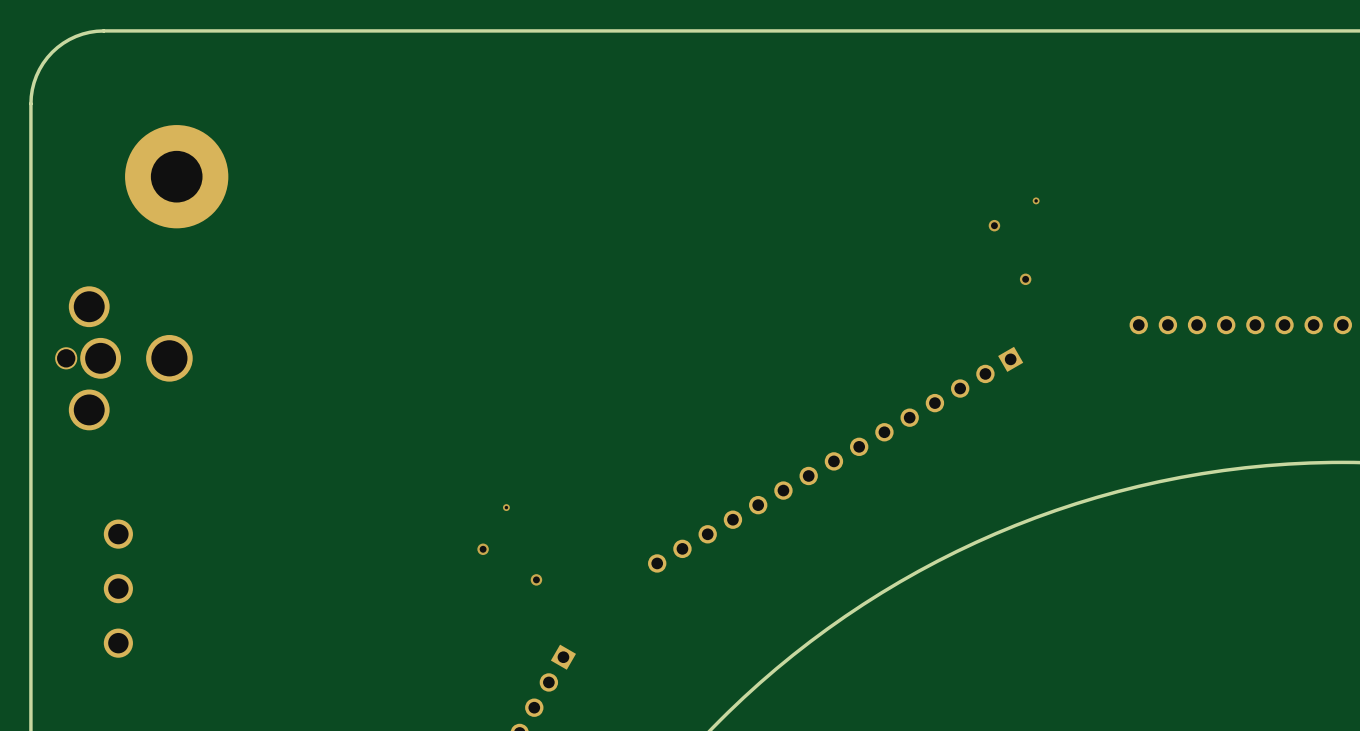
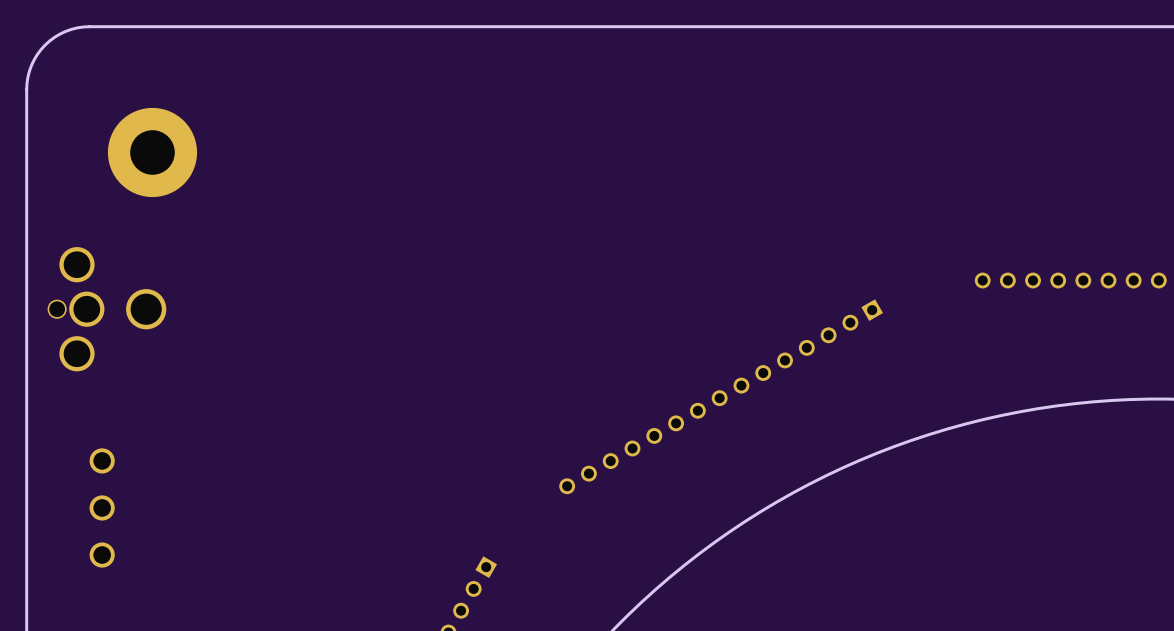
via: (1036, 200) -> none
via: (994, 225) -> none
via: (1025, 279) -> none
via: (506, 507) -> none
via: (483, 549) -> none
via: (536, 579) -> none

